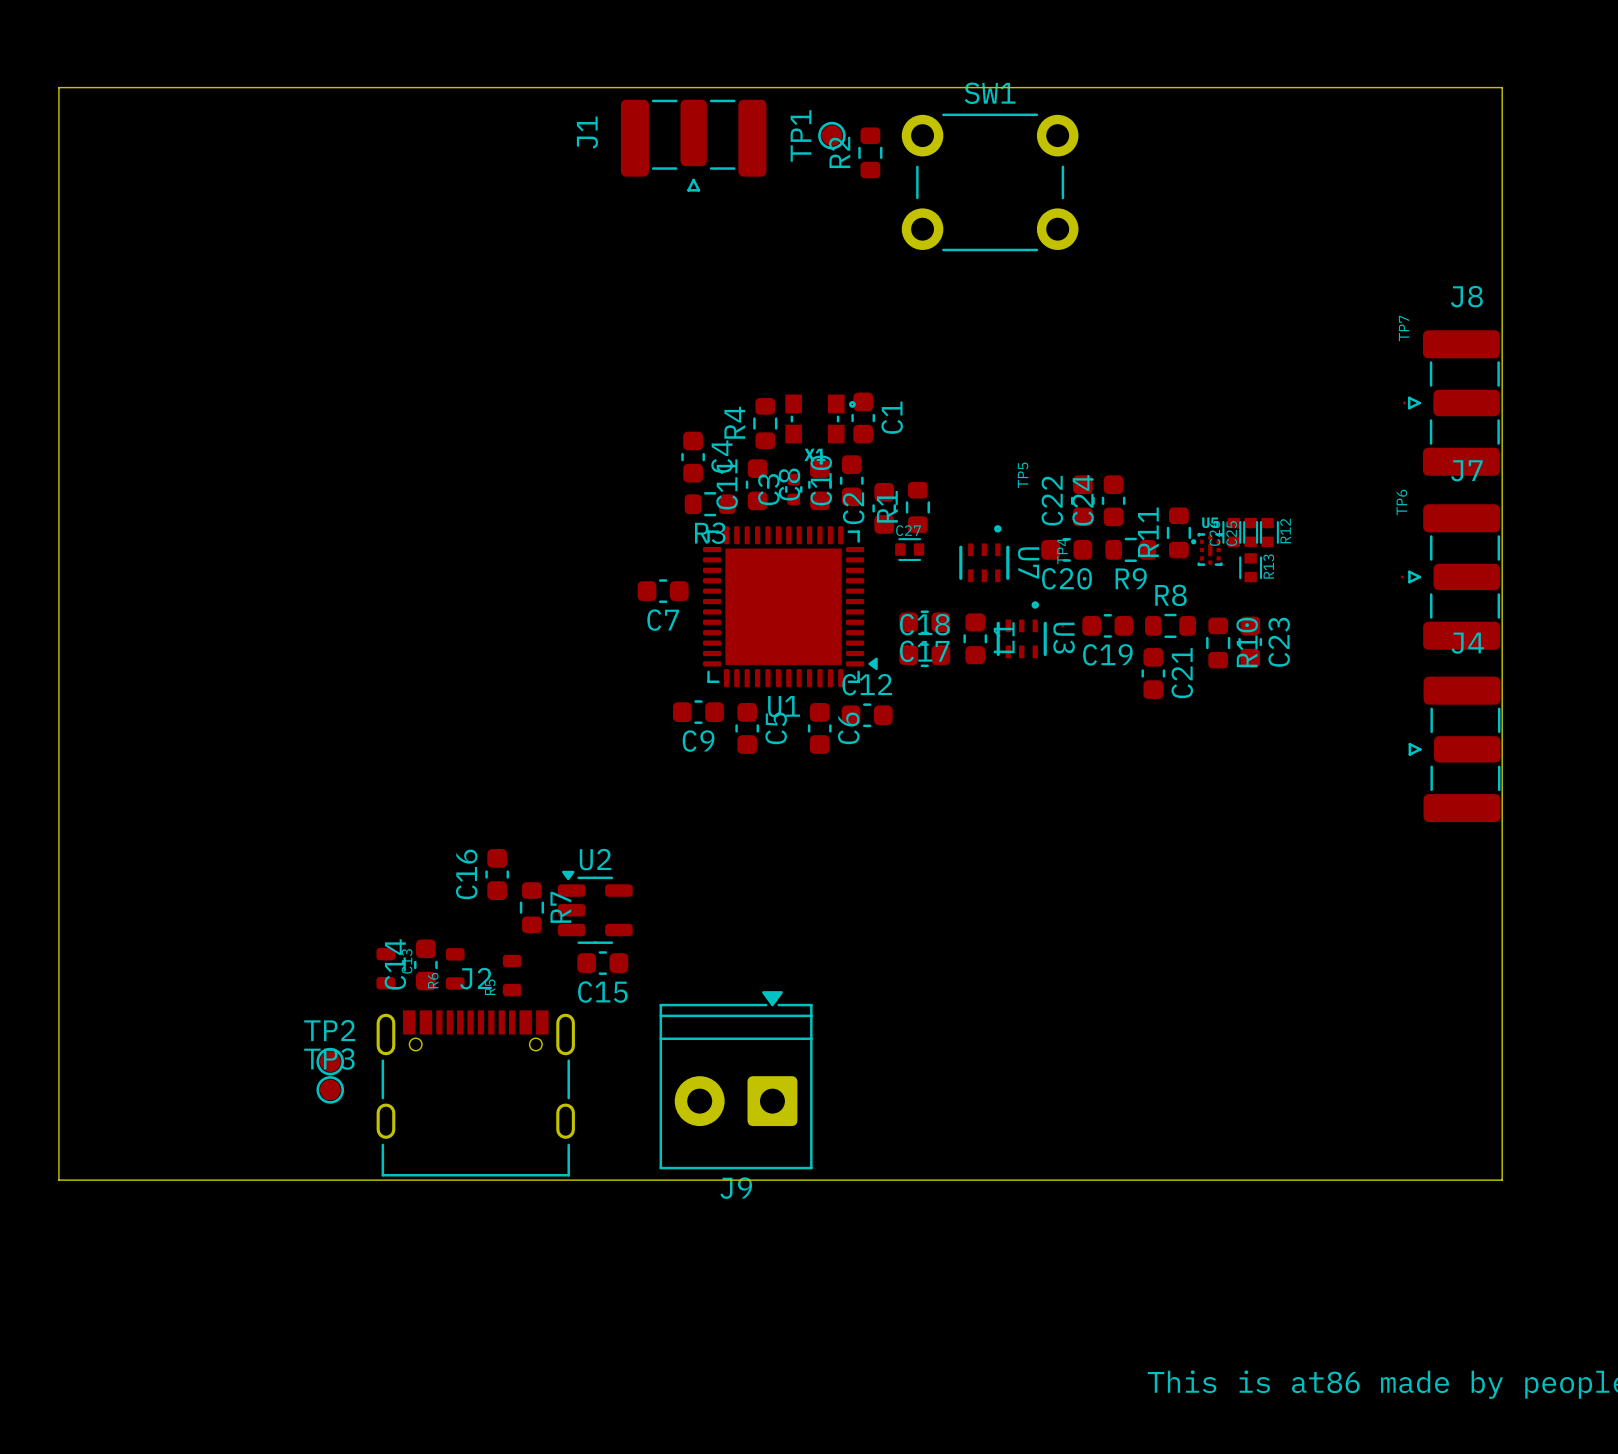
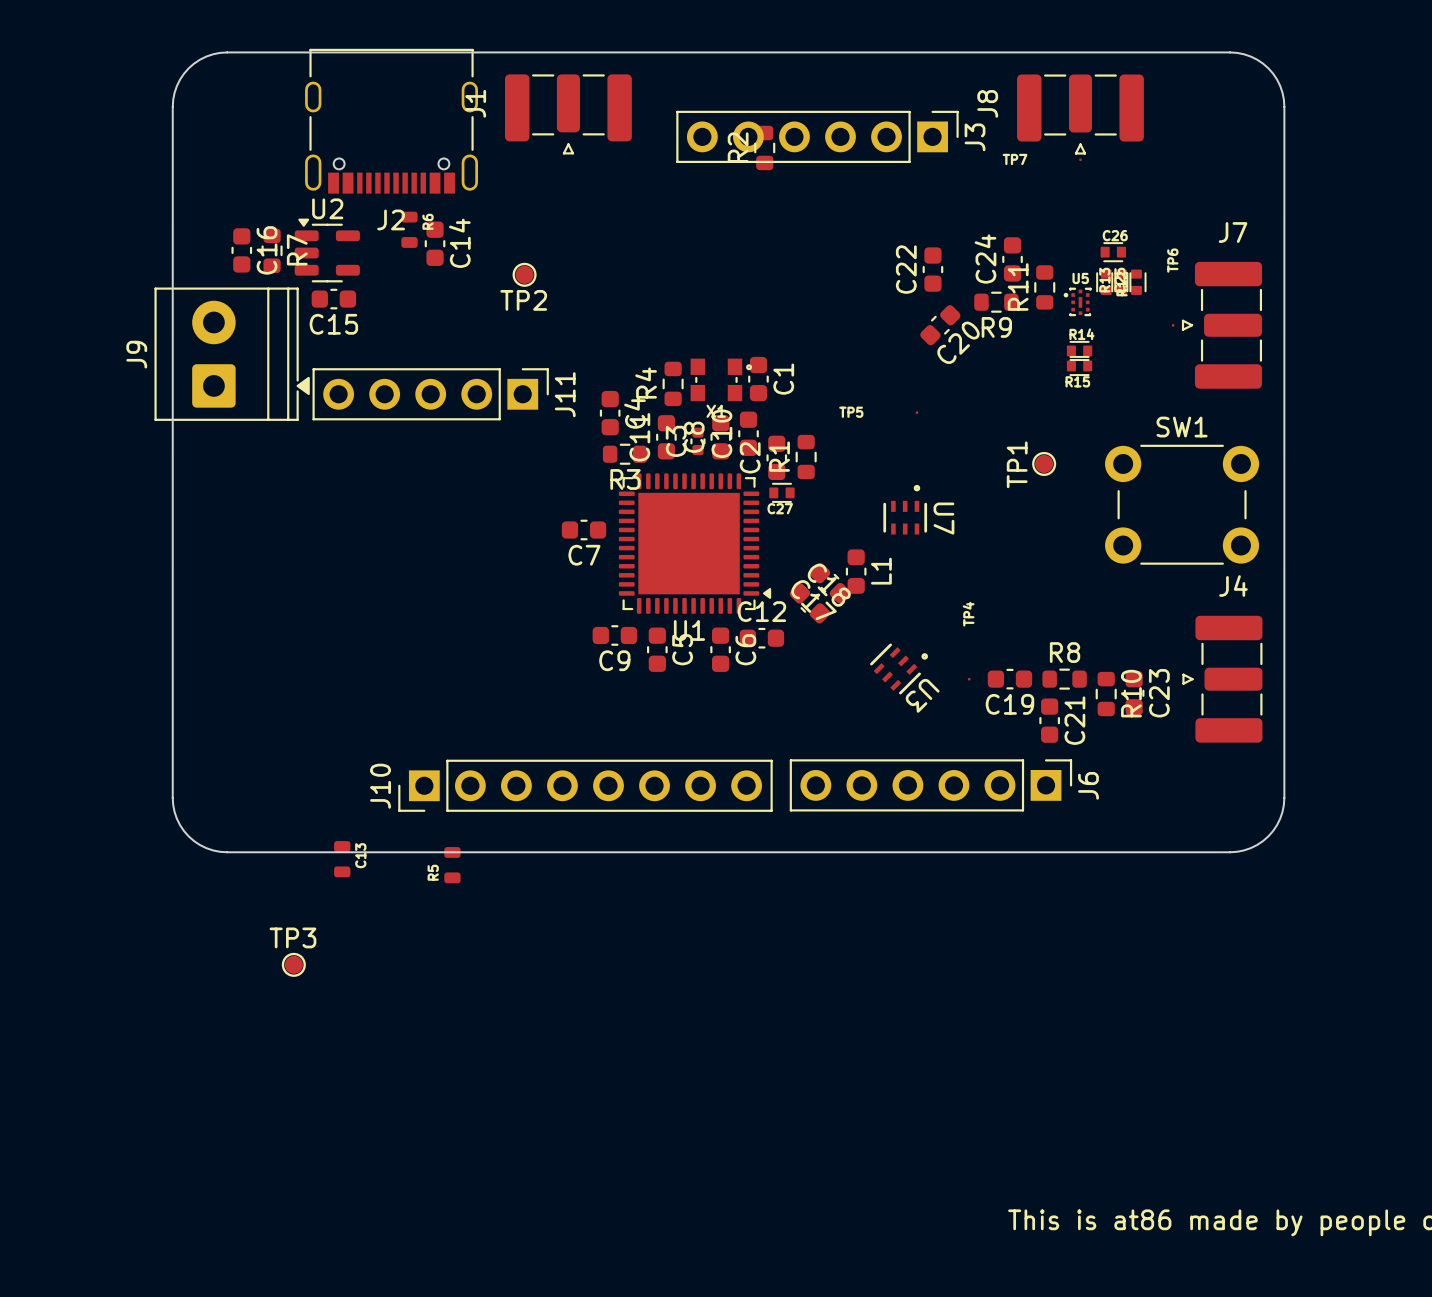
board edge: (58, 87) (1502, 87) (1502, 1180) (58, 1180) (58, 87) -> (227, 52) (206, 56) (188, 68) (176, 86) (172, 106) (172, 797) (174, 811) (180, 825) (194, 841) (213, 850) (227, 852) (1229, 852) (1250, 848) (1263, 841) (1273, 830) (1282, 811) (1284, 797) (1284, 106) (1282, 92) (1277, 79) (1263, 63) (1244, 54) (1230, 52) (227, 52)
TP1 position: (831, 135) -> (1044, 463)
J3: none -> (817, 136)
J1 position: (693, 145) -> (568, 114)
SW1 position: (990, 182) -> (1182, 504)
TP7 name rotation: 0° (1404, 328) -> 90° clockwise (1015, 159)
TP7 name position: TP7 (1404, 328) -> TP7 (1015, 159)
R14: none -> (1079, 350)
R15: none -> (1079, 365)
TP7 position: (1404, 402) -> (1080, 159)
J8 rotation: 0° (1453, 403) -> 90° counterclockwise (1080, 114)
J8 position: (1453, 403) -> (1080, 114)
J11: none -> (430, 394)
TP5 name rotation: 0° (1023, 475) -> 90° clockwise (851, 412)
TP5 name position: TP5 (1023, 475) -> TP5 (851, 412)
C22 position: (1082, 500) -> (932, 269)
C24 position: (1113, 500) -> (1012, 259)
C27 name position: C27 (908, 530) -> C27 (780, 508)
R11 position: (1178, 532) -> (1044, 287)
C26 rotation: 0° (1233, 532) -> 90° clockwise (1113, 252)
C26 position: (1233, 532) -> (1113, 252)
C25 position: (1250, 532) -> (1136, 282)
R12 position: (1267, 532) -> (1106, 282)
C27 position: (909, 549) -> (781, 492)
TP5 position: (1023, 549) -> (916, 412)
C20 rotation: 0° (1066, 549) -> 45° counterclockwise (940, 325)
C20 position: (1066, 549) -> (940, 325)
R9 position: (1130, 549) -> (996, 302)
U5 position: (1207, 549) -> (1077, 301)
U7 position: (984, 553) -> (905, 509)
R13 name position: R13 (1268, 566) -> R13 (1104, 280)
R13 position: (1250, 567) -> (1121, 282)
TP6 position: (1402, 577) -> (1173, 325)
J7 position: (1454, 577) -> (1221, 325)
C17 rotation: 0° (924, 622) -> 45° clockwise (830, 583)
C17 position: (924, 622) -> (830, 583)
TP4 position: (1062, 625) -> (969, 679)
C19 position: (1107, 625) -> (1009, 679)
R8 position: (1170, 625) -> (1064, 679)
U3 rotation: 0° (1021, 629) -> 45° clockwise (898, 668)
U3 position: (1021, 629) -> (898, 668)
C23 position: (1250, 642) -> (1134, 693)
R10 position: (1218, 643) -> (1106, 694)
C18 rotation: 0° (924, 655) -> 45° clockwise (809, 603)
C21 position: (1153, 673) -> (1049, 720)
J4 position: (1454, 749) -> (1222, 679)
C16 name position: C16 (466, 874) -> C16 (267, 250)
C16 position: (497, 874) -> (241, 250)
J10: none -> (585, 785)
J6: none -> (930, 785)
R7 position: (531, 907) -> (272, 250)
U2 position: (595, 907) -> (327, 250)
C15 position: (602, 963) -> (333, 299)
C14 name position: C14 (395, 964) -> C14 (459, 243)
C14 position: (425, 964) -> (435, 243)
R6 position: (455, 968) -> (409, 229)
R6 name position: R6 (433, 980) -> R6 (428, 221)
TP2 name position: TP2 (329, 1030) -> TP2 (523, 300)
TP2 position: (330, 1061) -> (524, 274)
J9 rotation: 0° (736, 1080) -> 90° clockwise (232, 354)
J9 position: (736, 1080) -> (232, 354)
J2 rotation: 0° (475, 1093) -> 180° (391, 121)
J2 position: (475, 1093) -> (391, 121)

